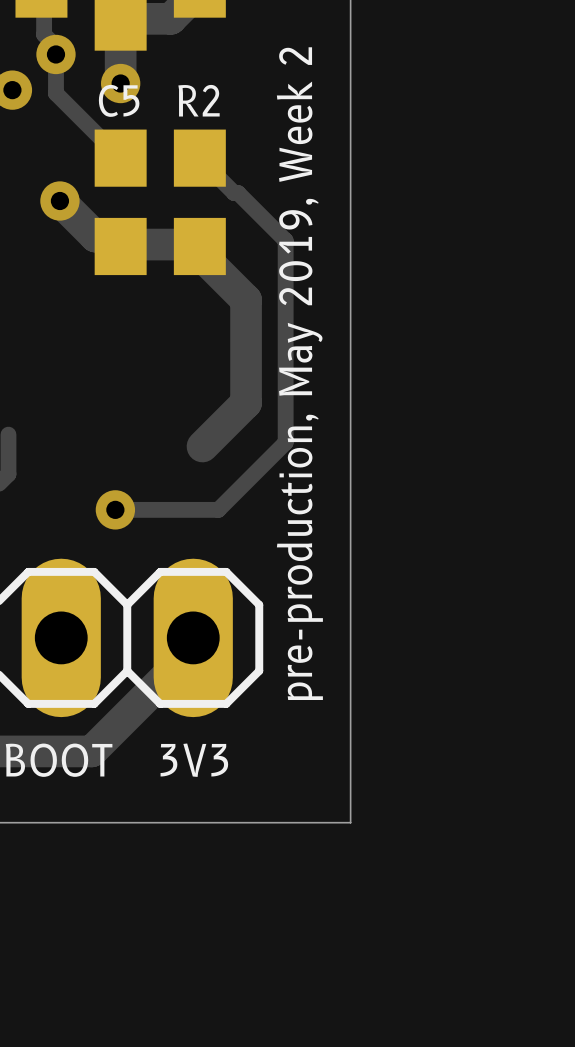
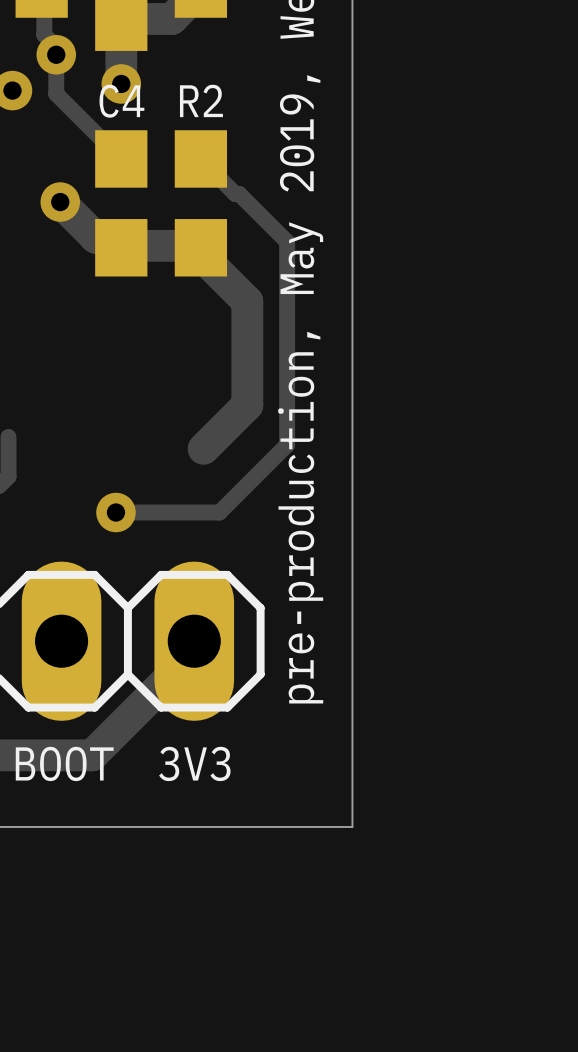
C5 name: C5 (119, 100) -> C4 (121, 101)

